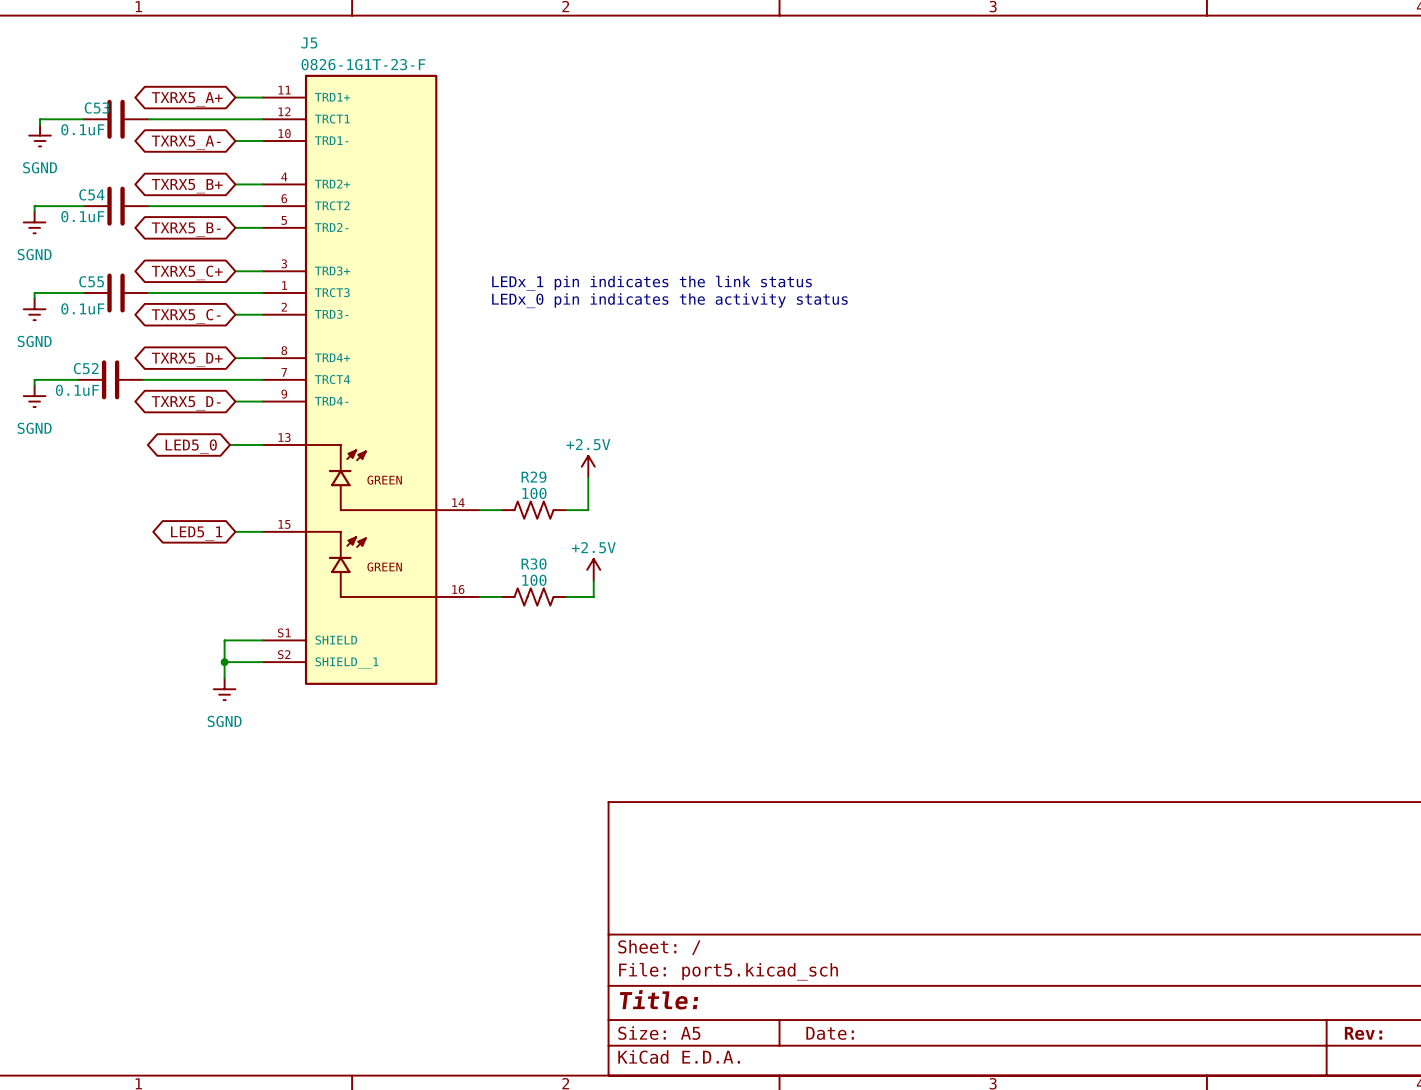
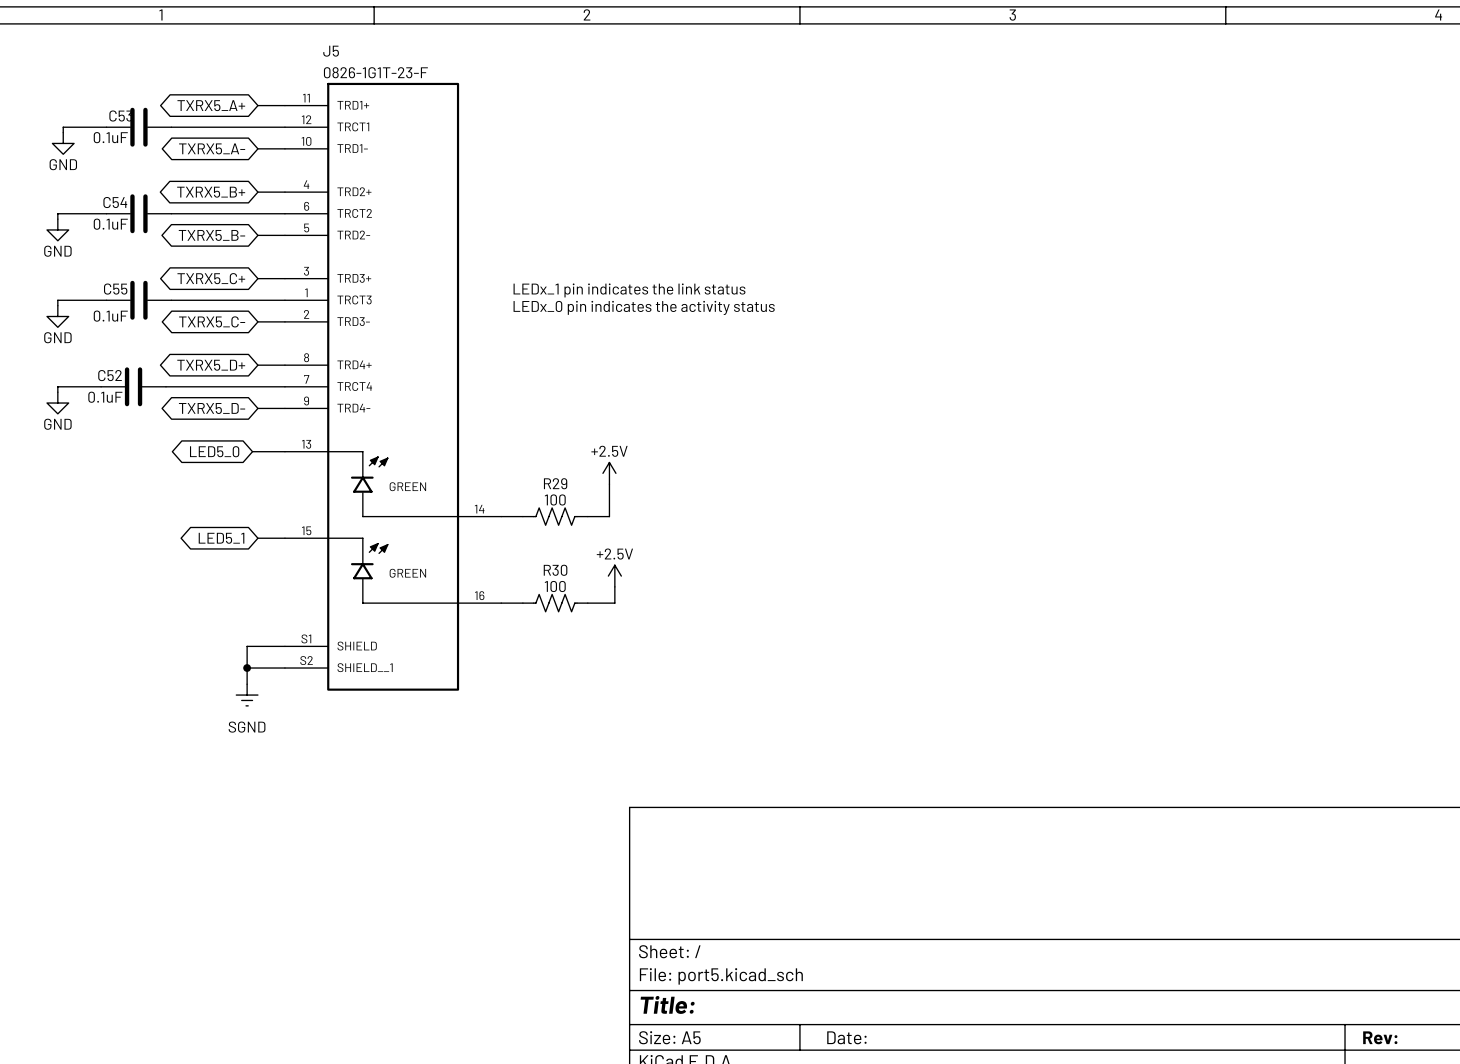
power symbol: SGND (40, 135) -> GND (63, 143)
power symbol: SGND (34, 222) -> GND (57, 229)
power symbol: SGND (34, 309) -> GND (57, 316)
power symbol: SGND (34, 396) -> GND (57, 403)

